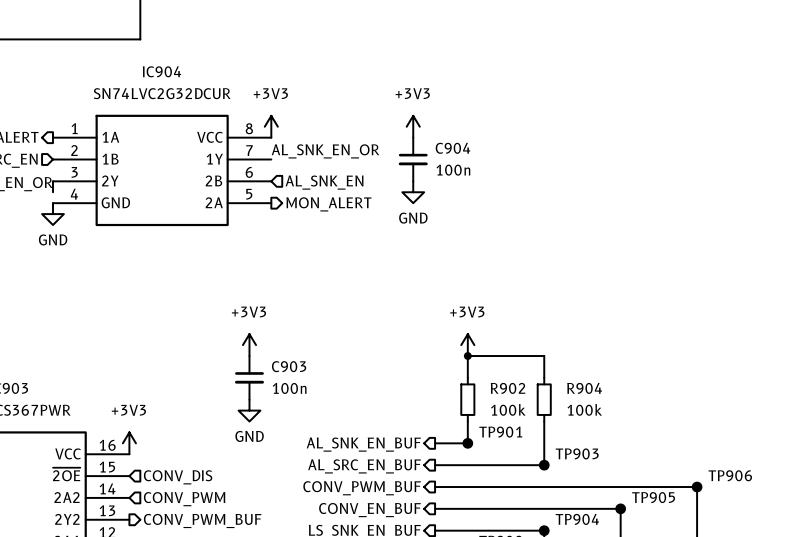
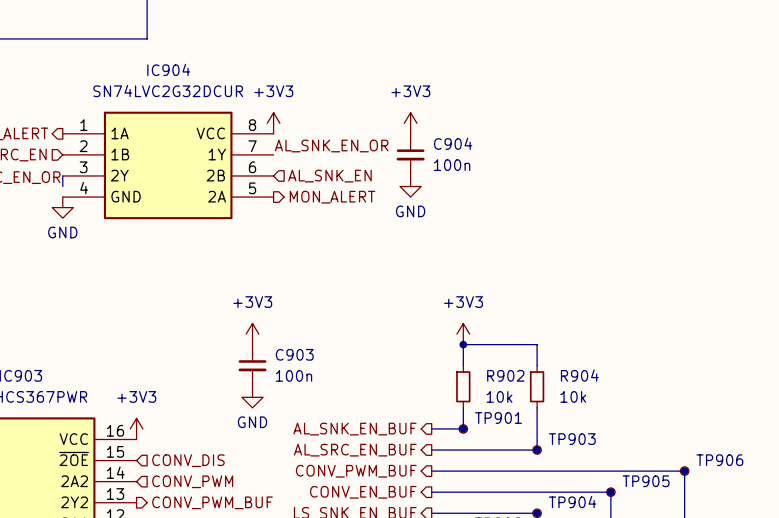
R902 value: 100k (508, 409) -> 10k (499, 396)
R904 value: 100k (584, 409) -> 10k (573, 396)

